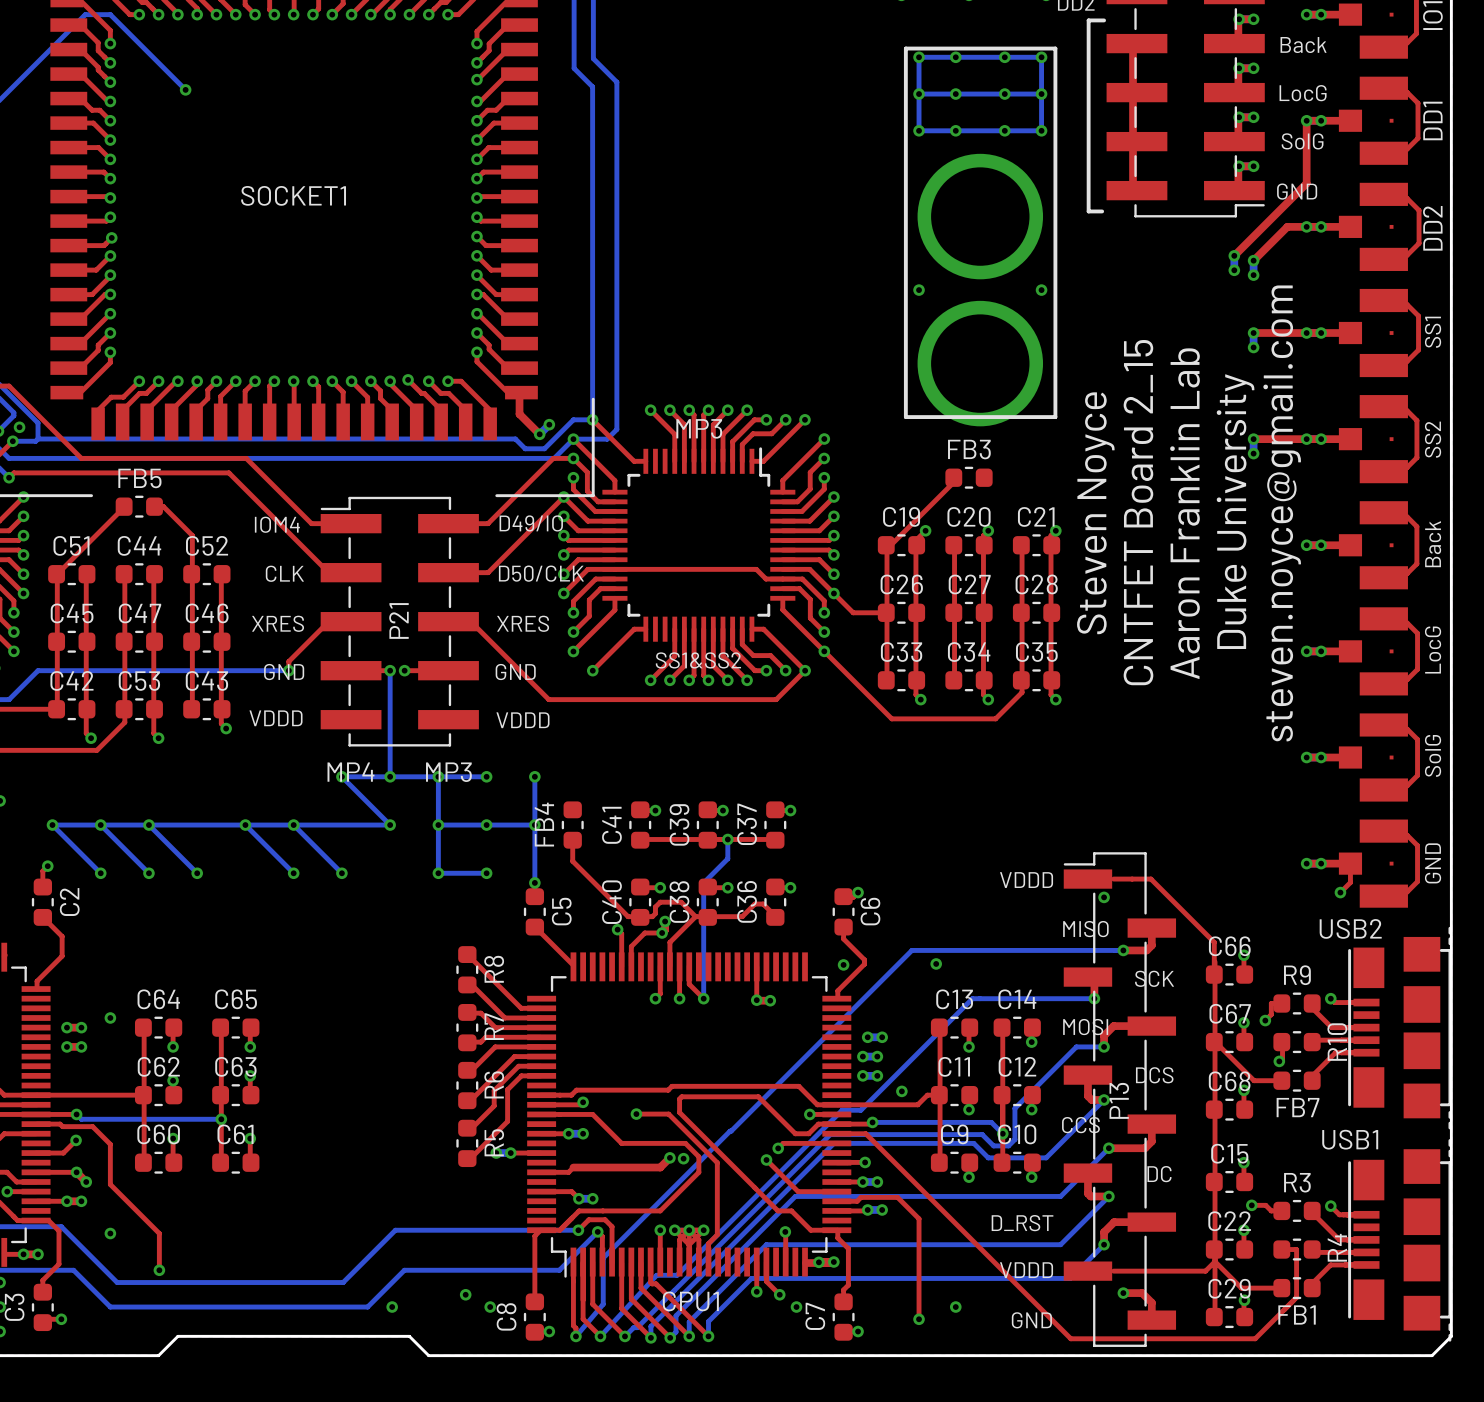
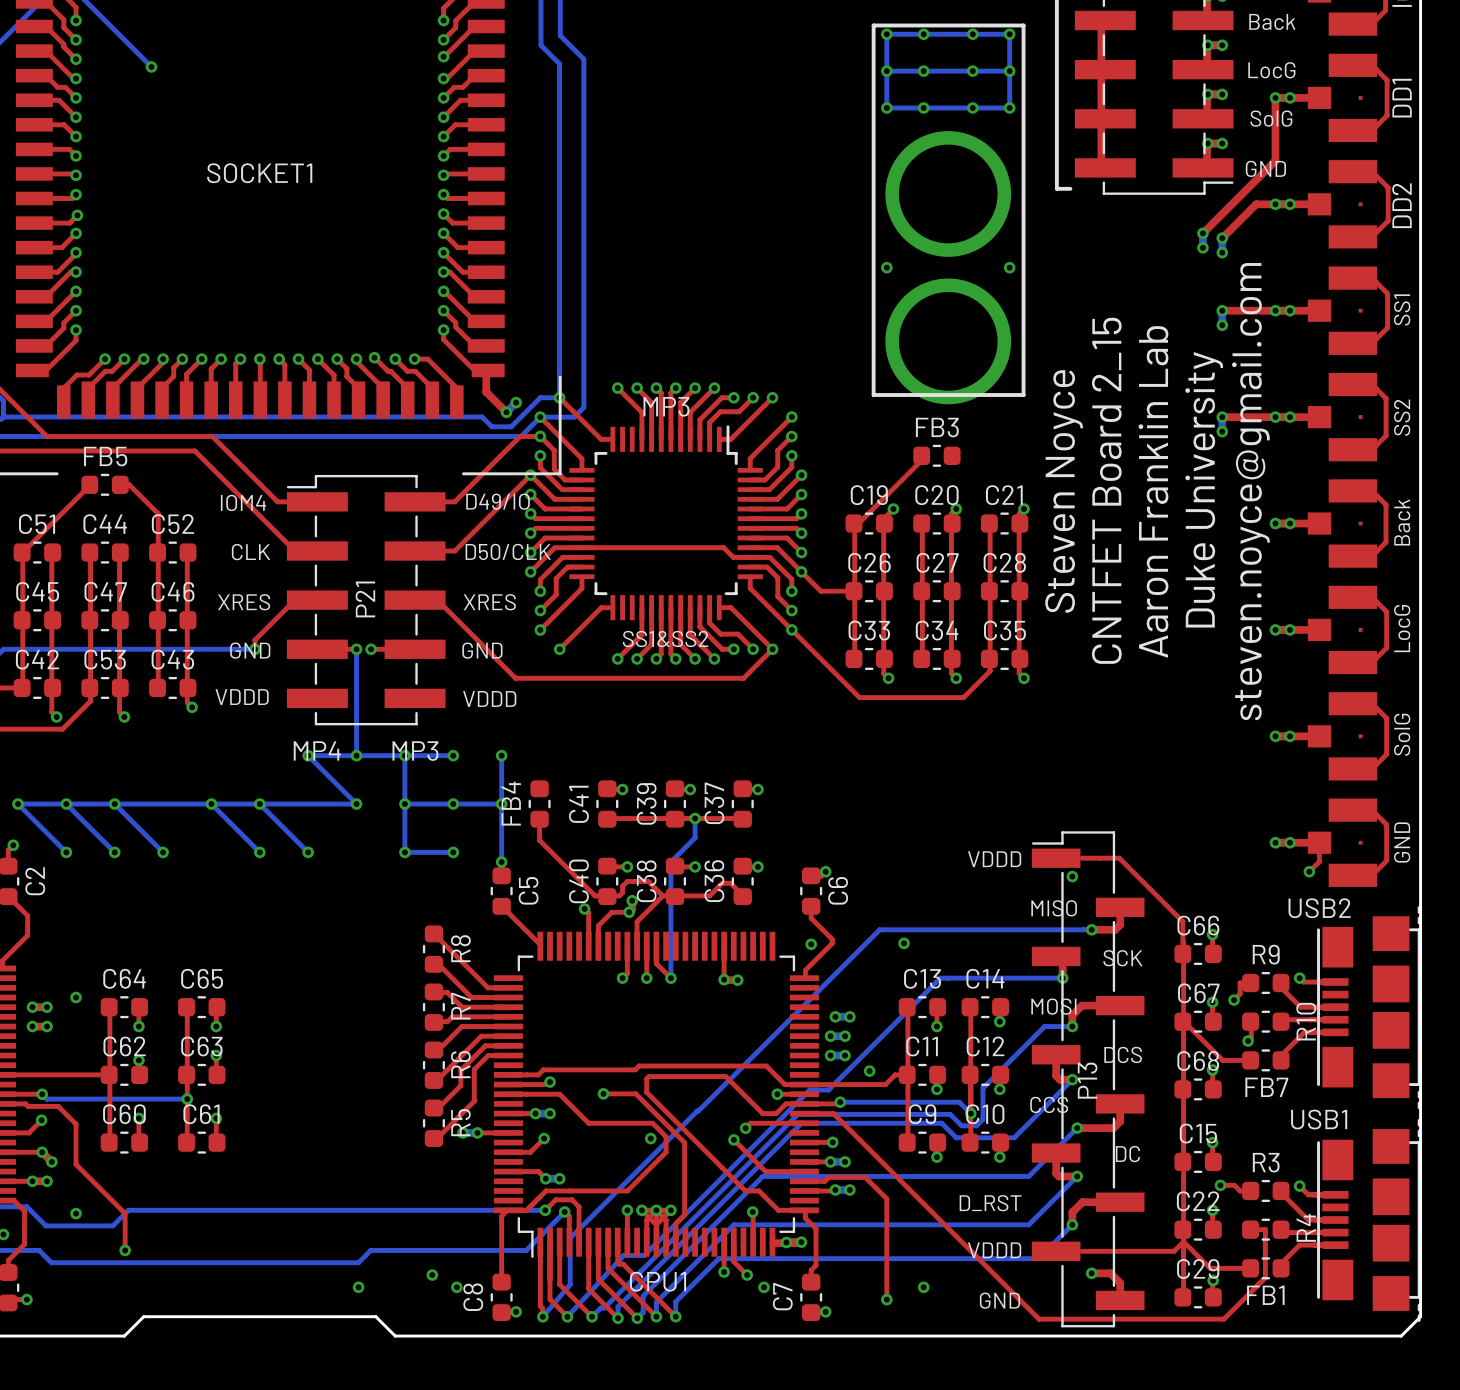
top track: (669, 1157) (660, 1167) (573, 1167) (568, 1172) (563, 1172) -> (544, 1138) (530, 1152)
via position: (669, 1157) -> (544, 1138)
bottom track: (395, 1230) (343, 1282) -> (358, 1262) (309, 1262)
bottom track: none -> (361, 1210) (128, 1210) (112, 1225) (46, 1225)
bottom track: (80, 1245) (117, 1282) -> (51, 1262) (82, 1262)
bottom track: (85, 1282) (110, 1307) (367, 1307) (392, 1282) -> none

